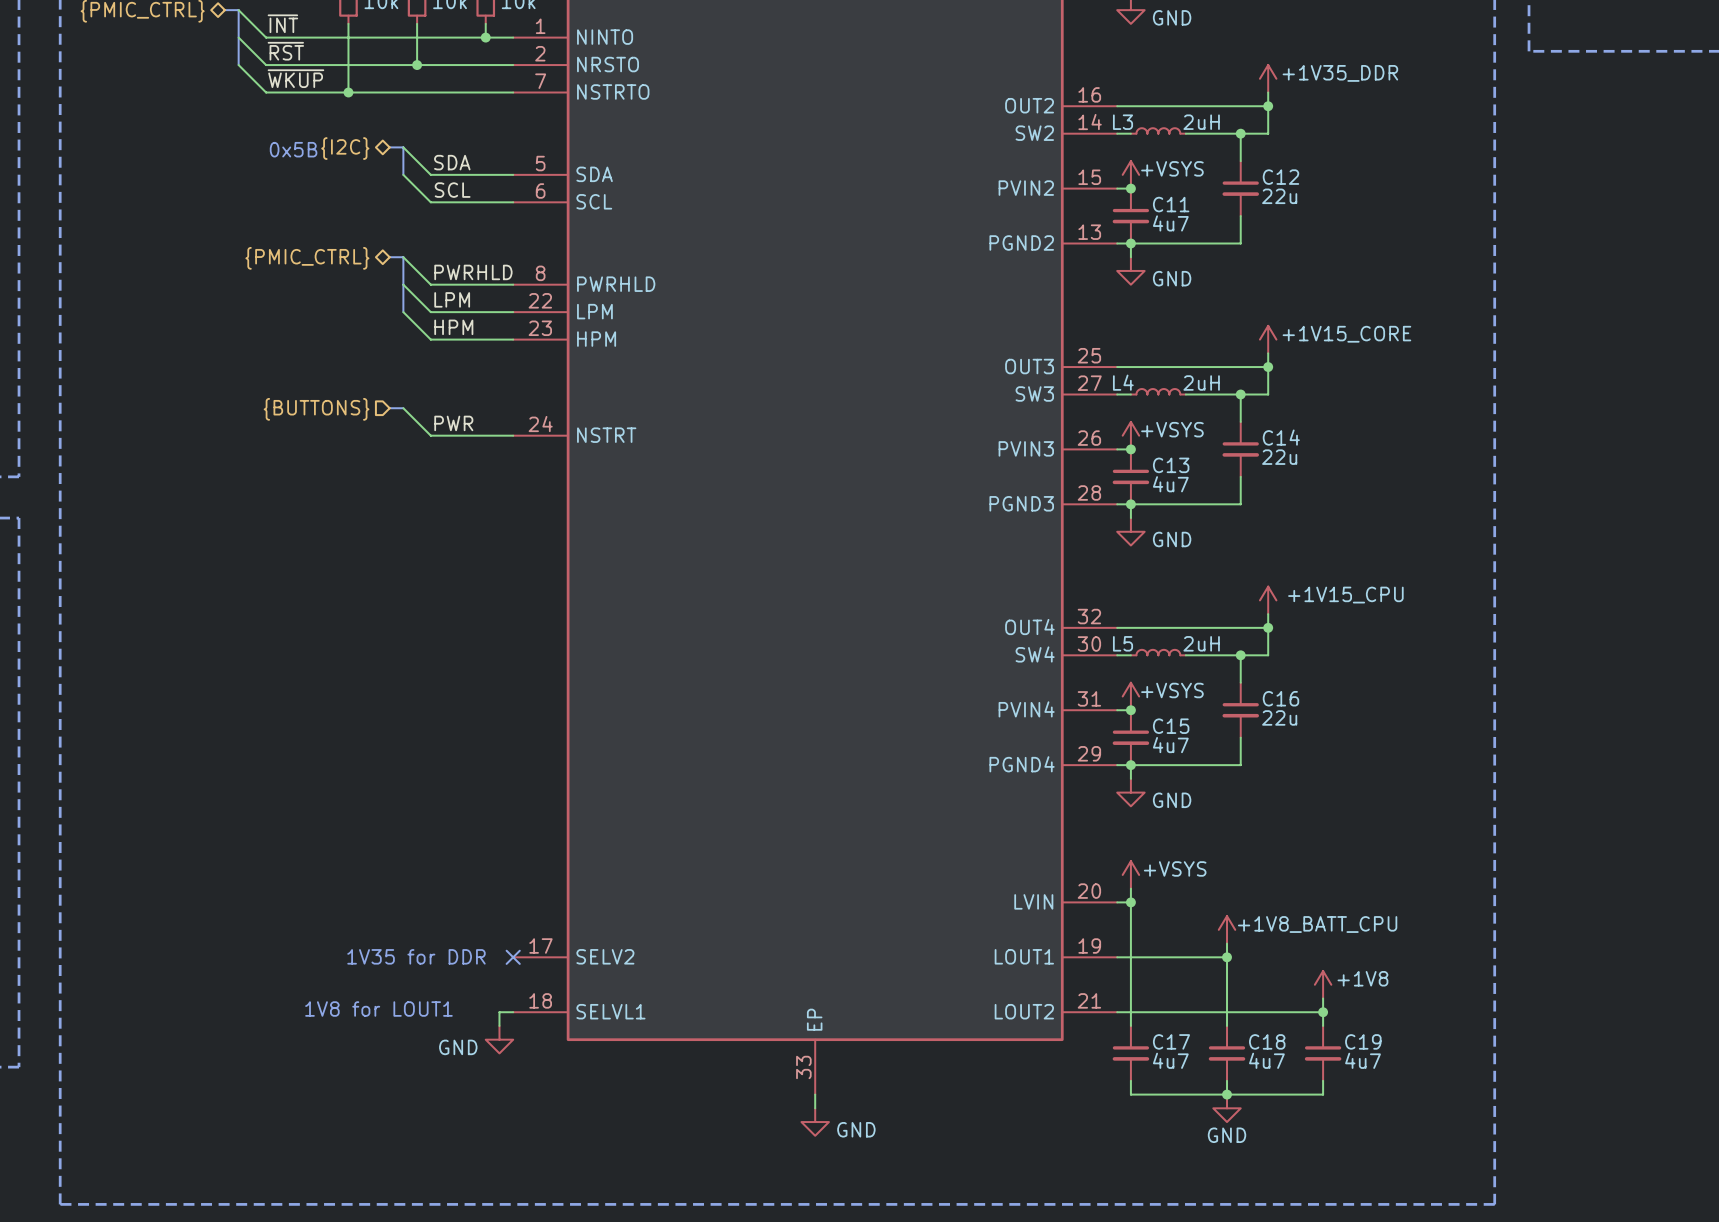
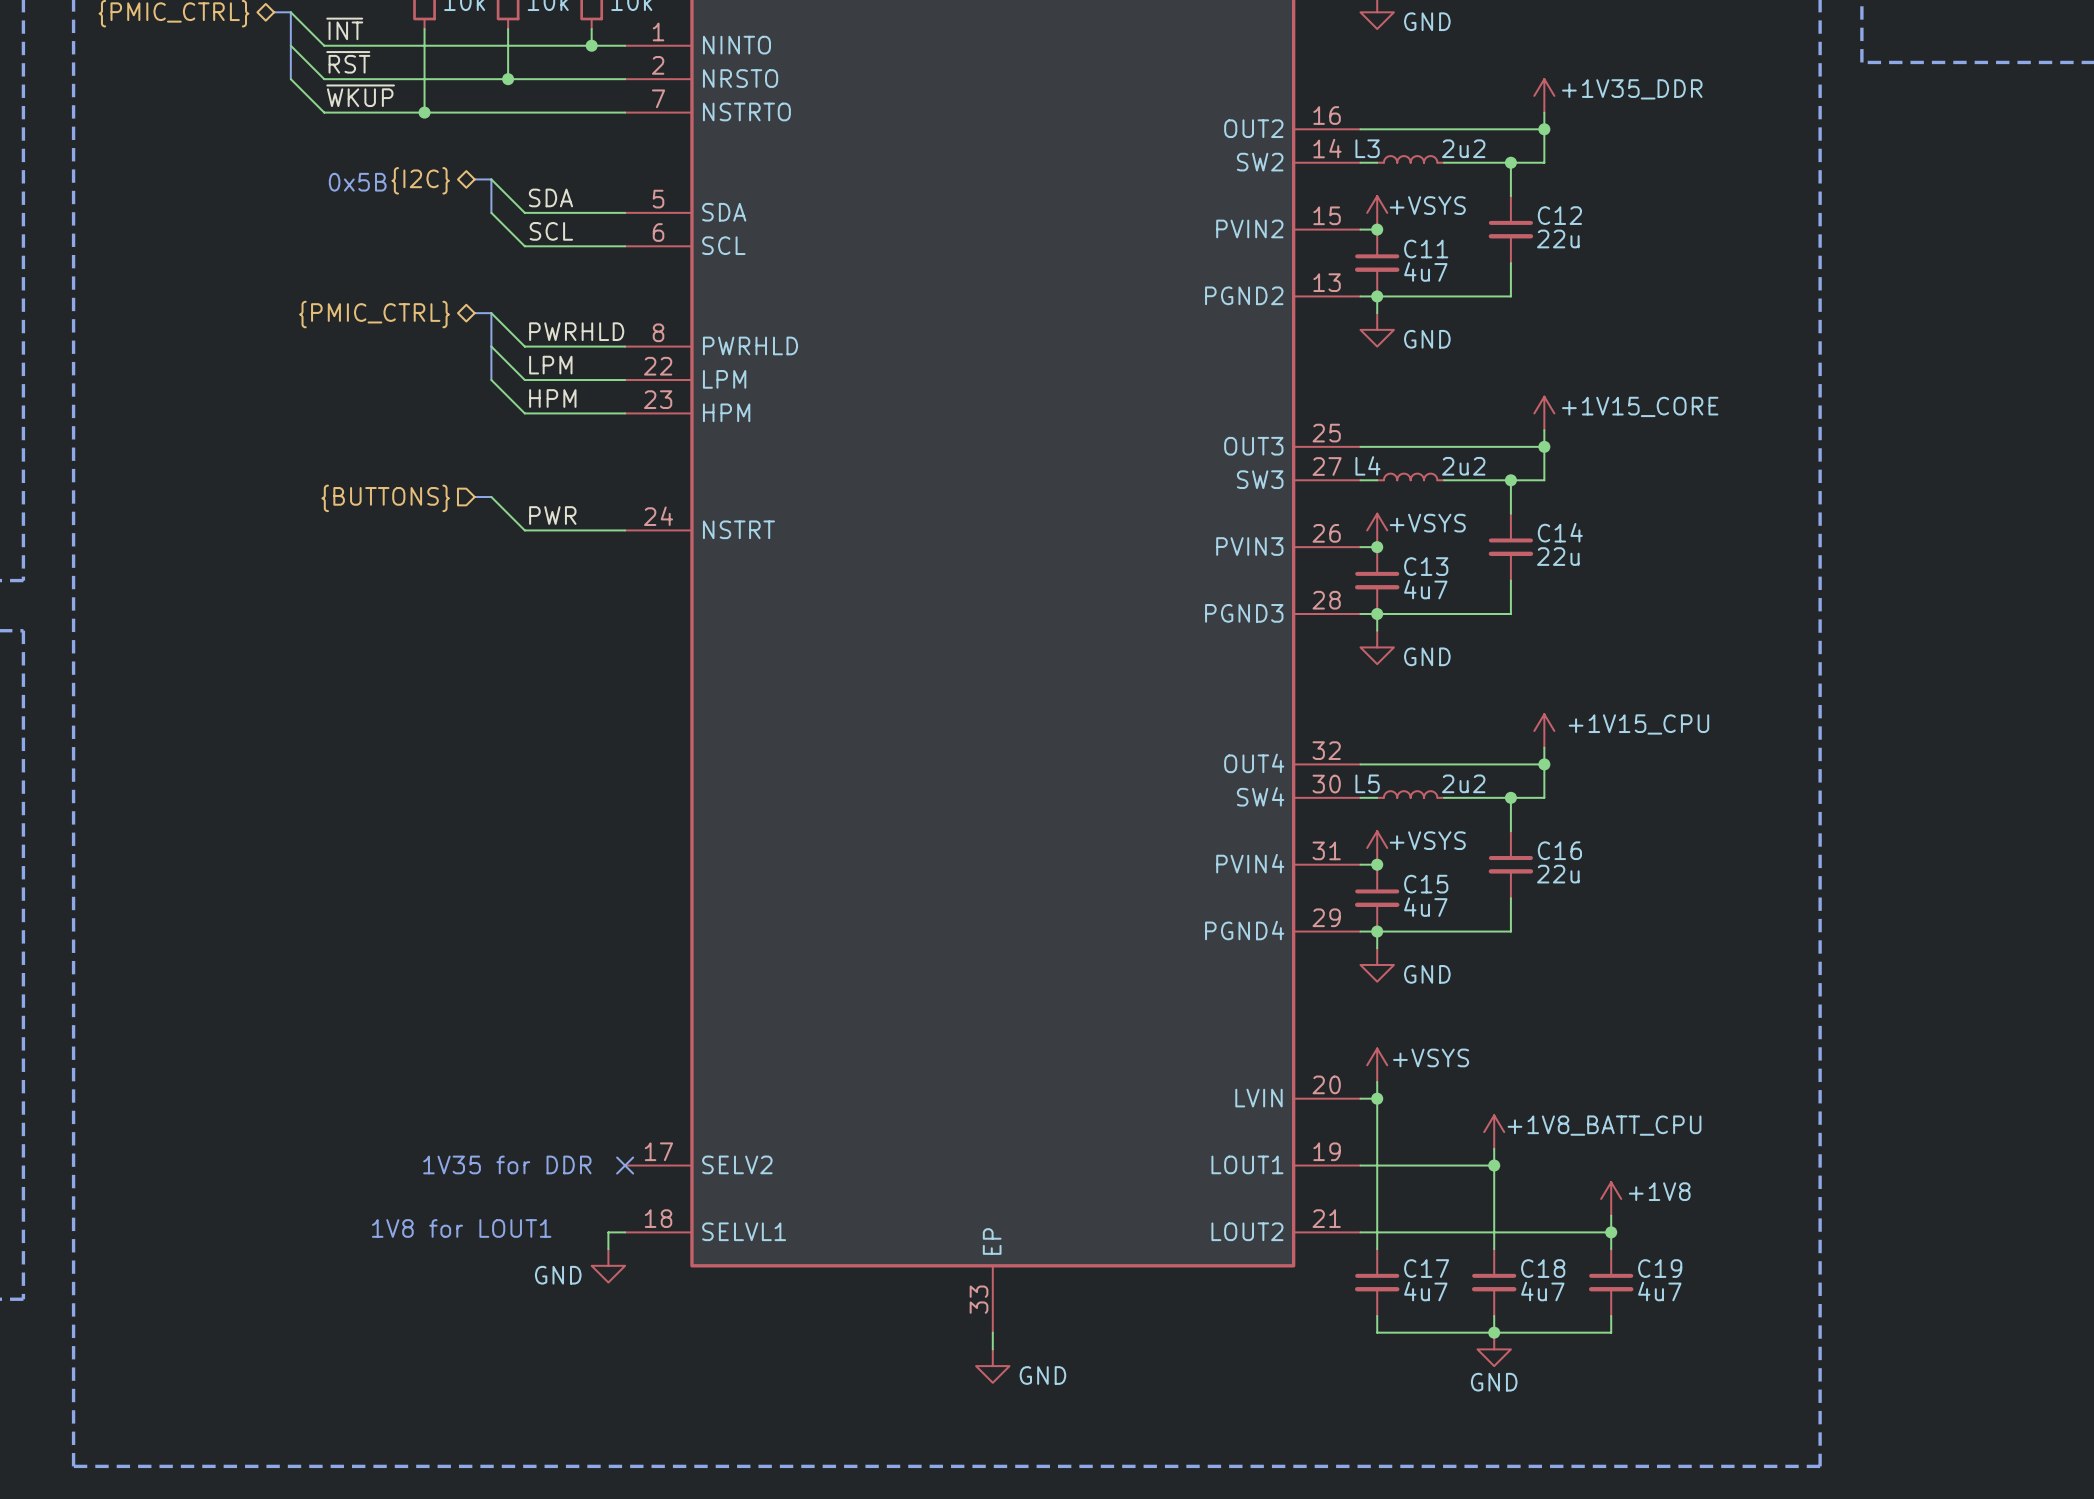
L3 value: 2uH (1201, 122) -> 2u2 (1463, 148)
L4 value: 2uH (1201, 383) -> 2u2 (1463, 466)
L5 value: 2uH (1201, 643) -> 2u2 (1463, 783)

